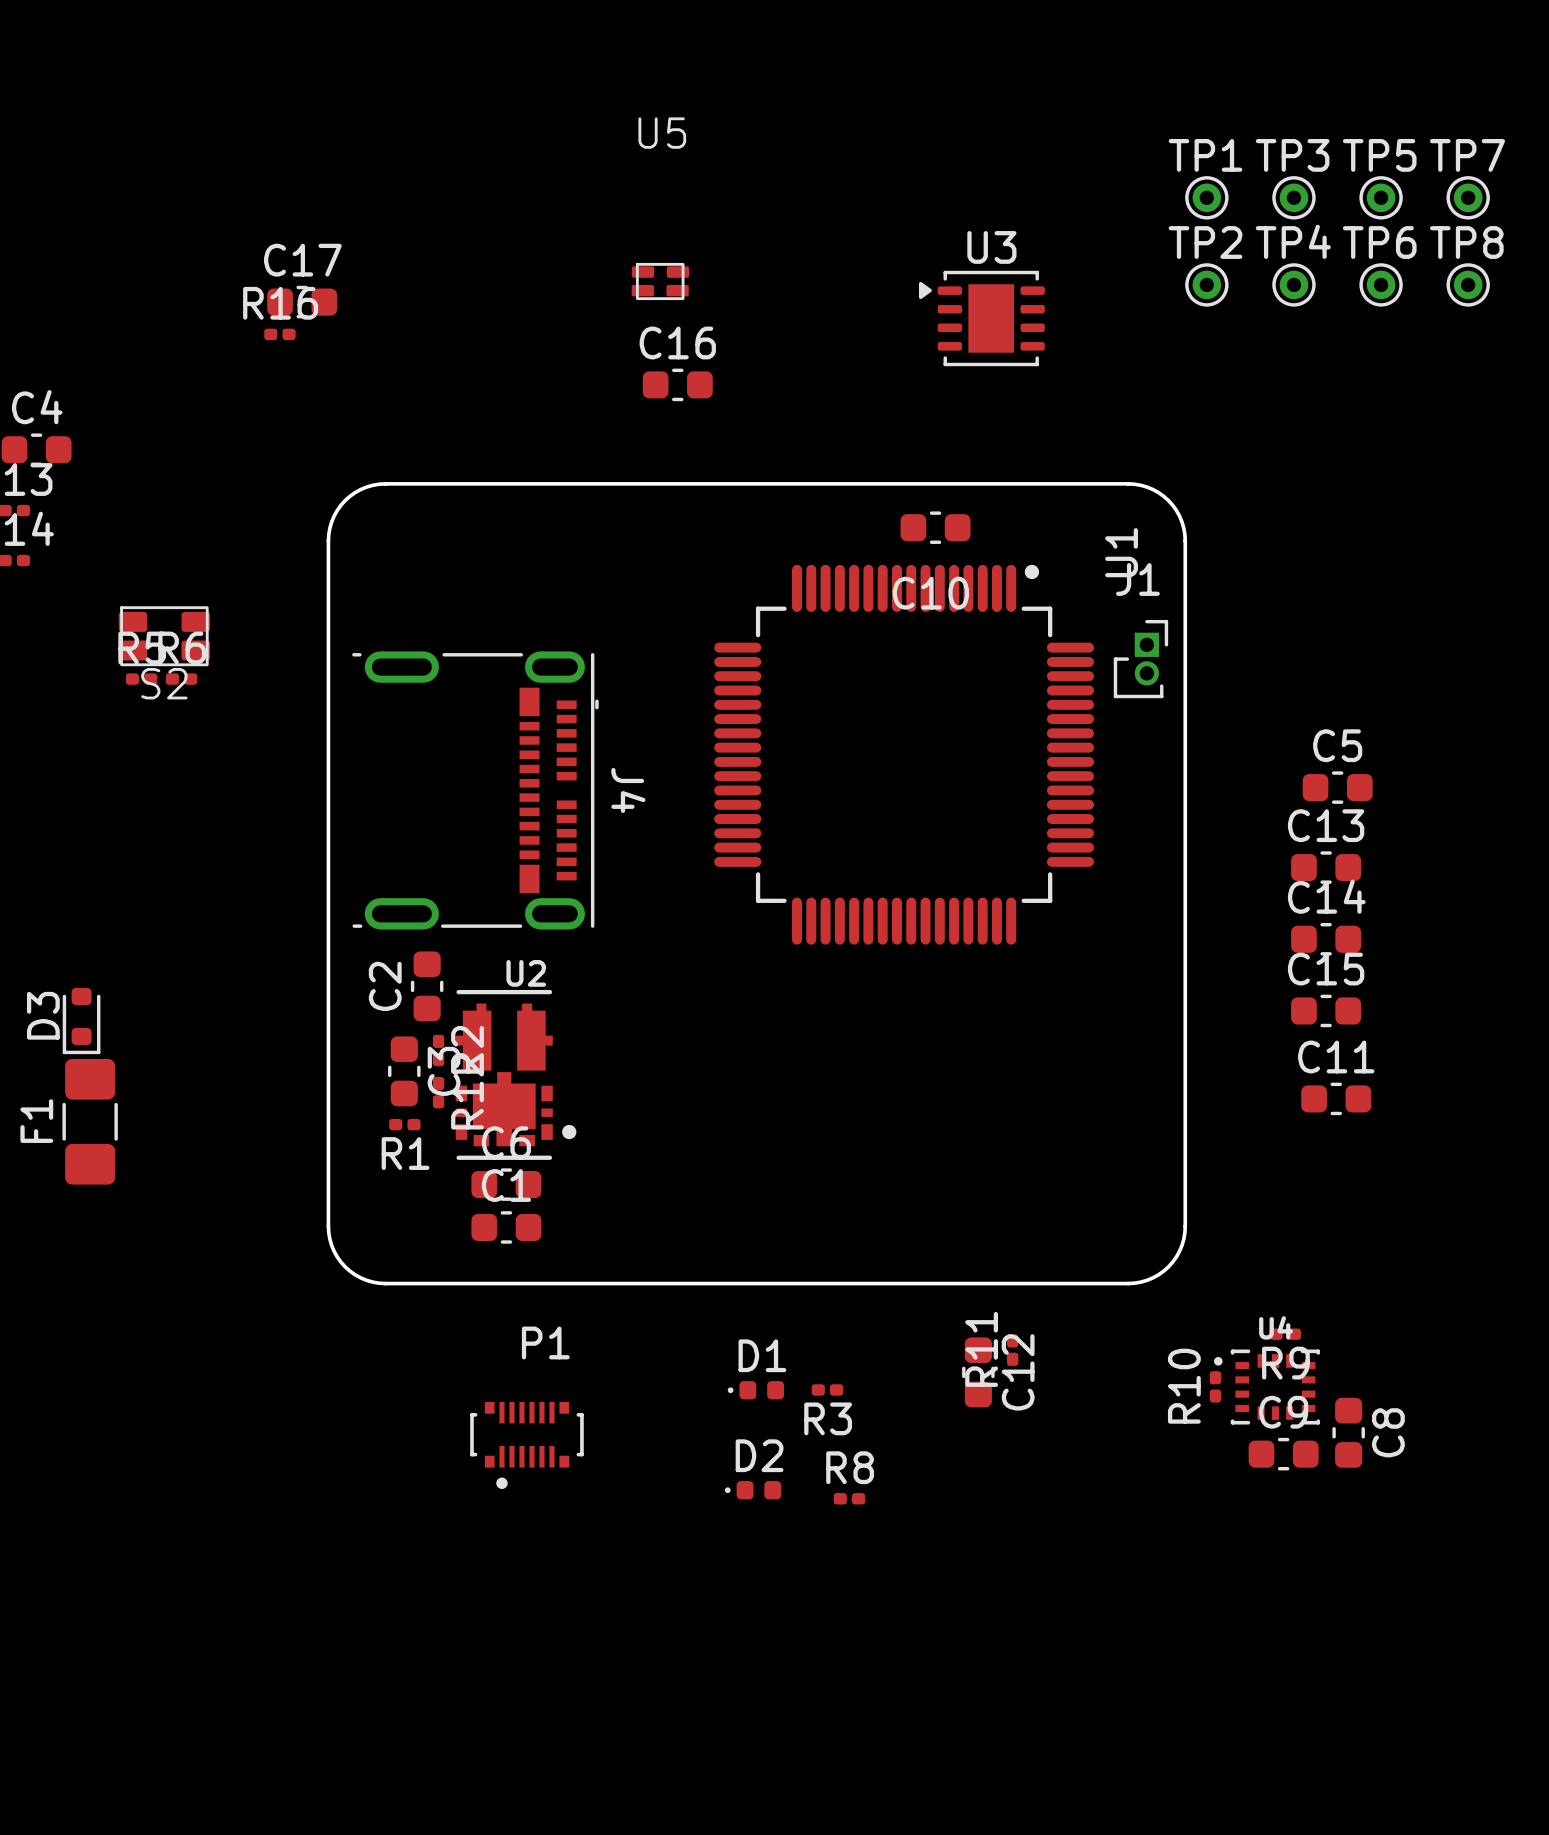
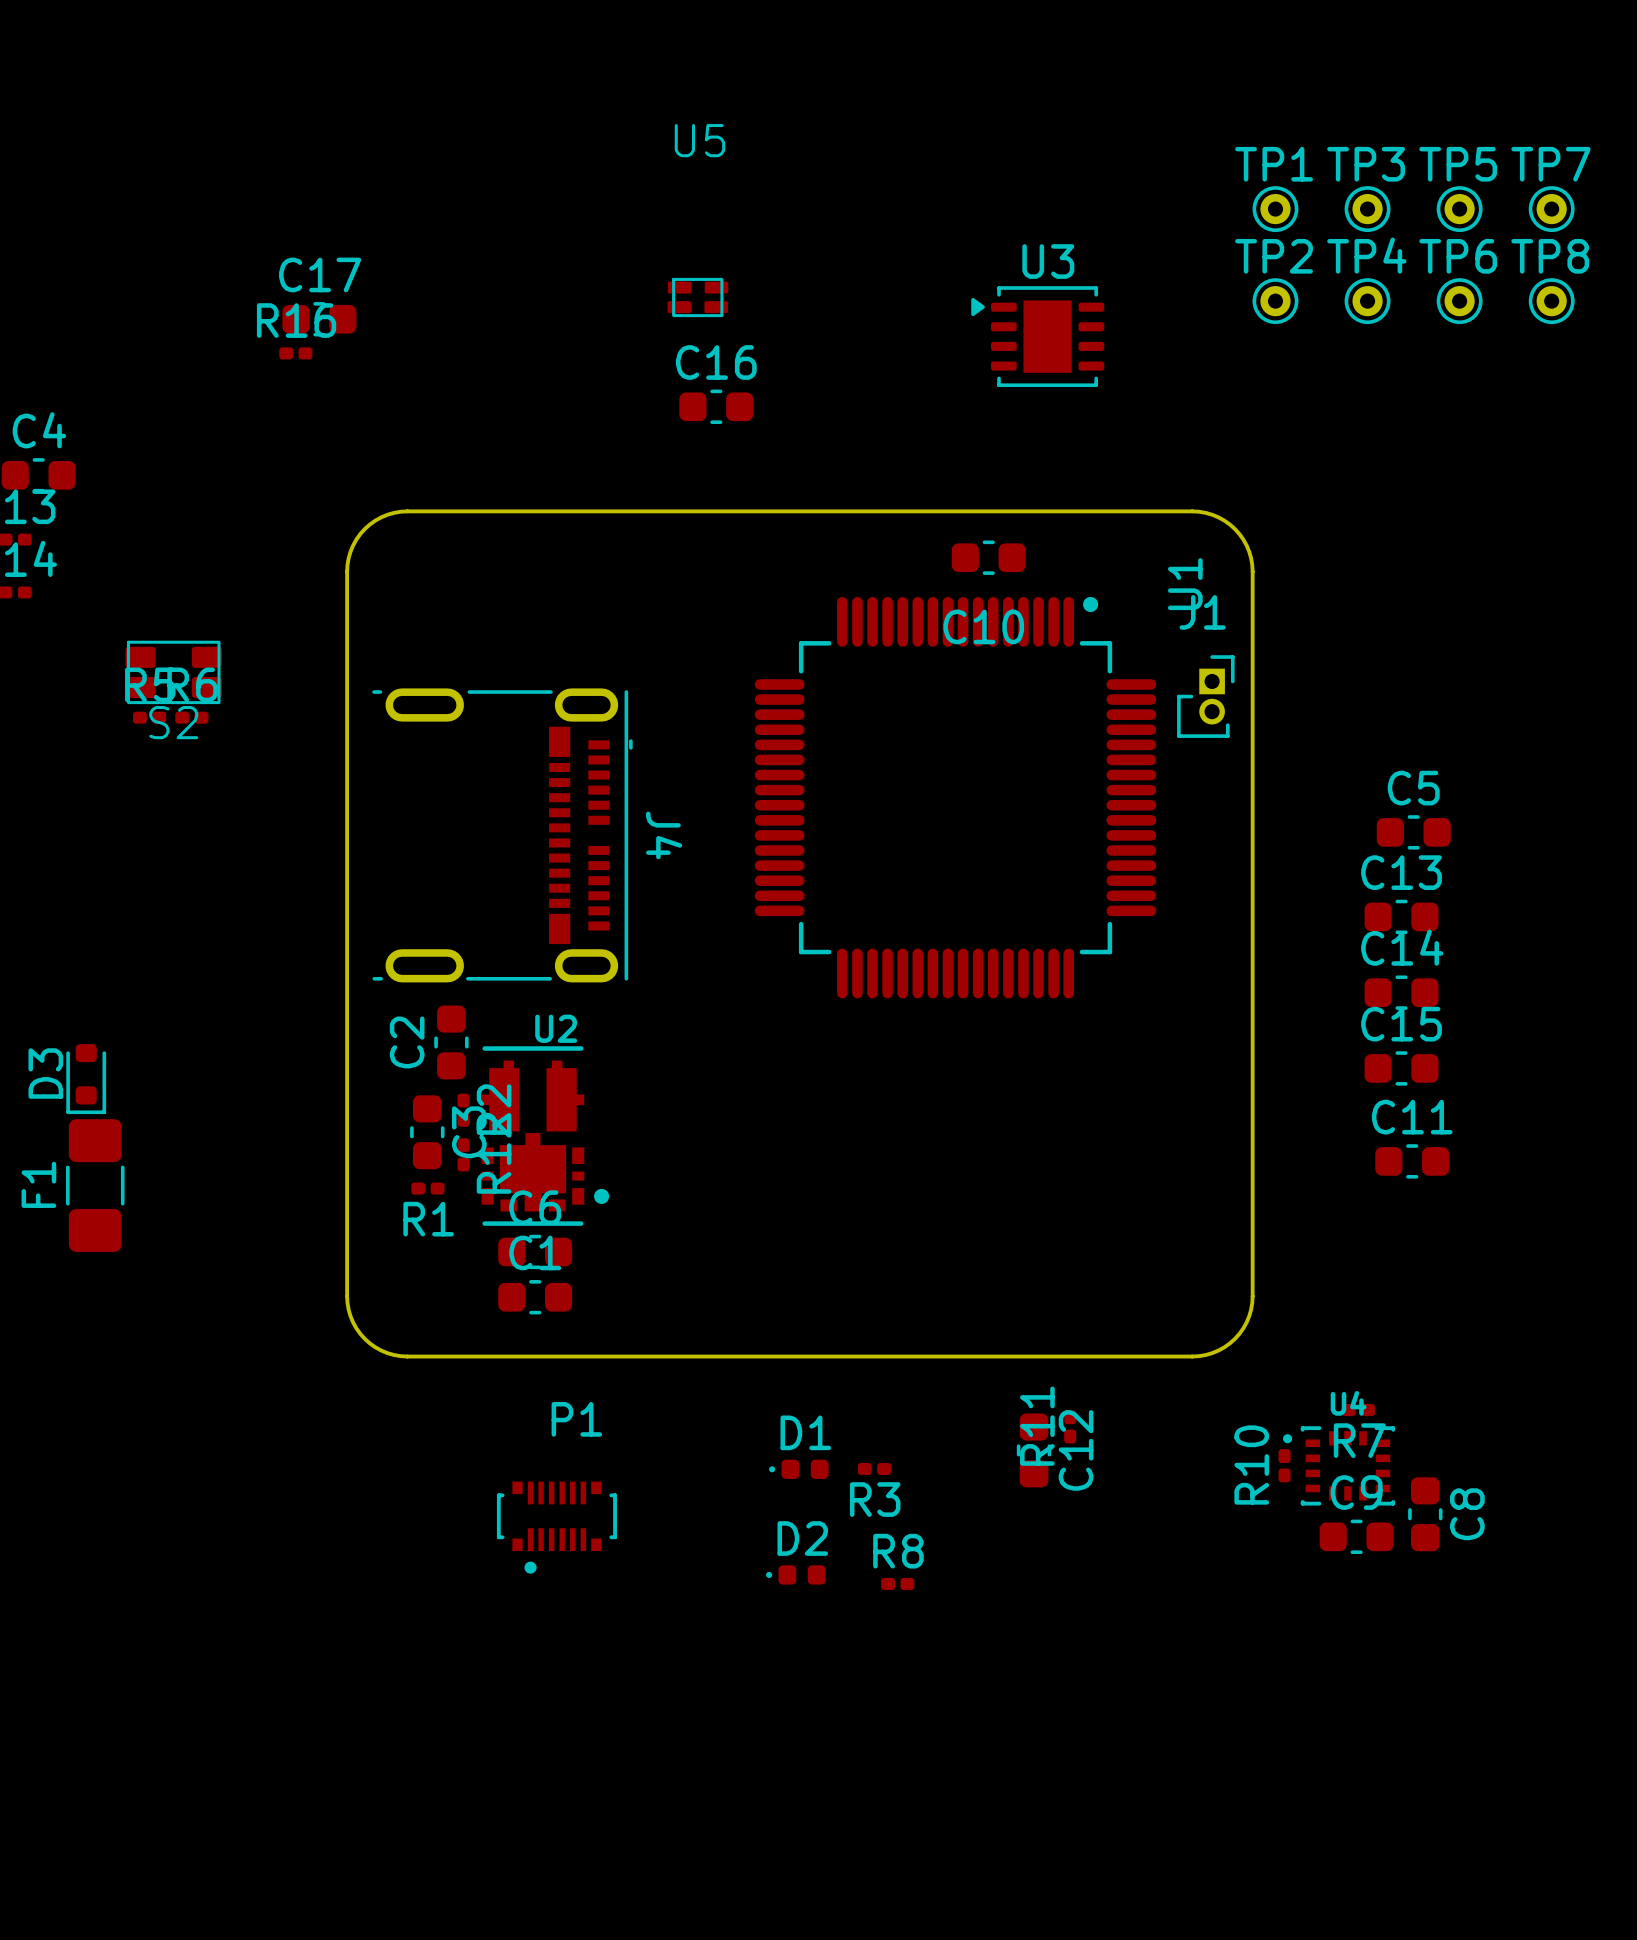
R9 name: R9 (1285, 1363) -> R7 (1359, 1440)

